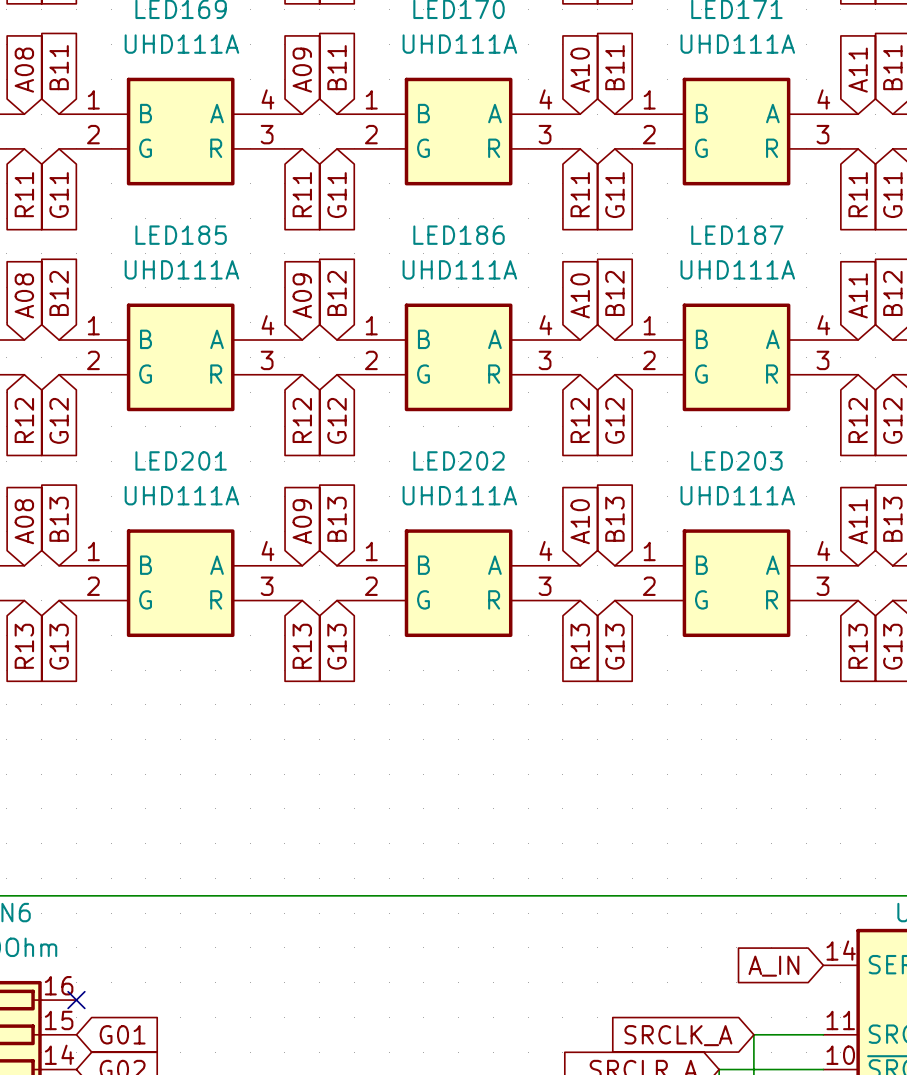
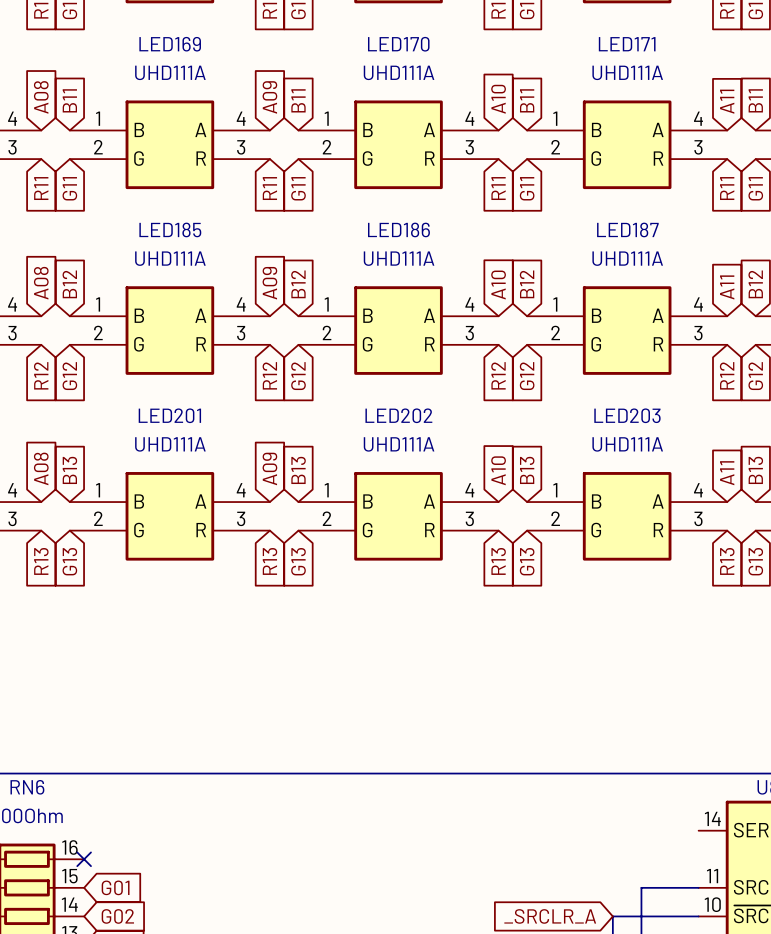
global label: A_IN (773, 966) -> none
global label: SRCLK_A (678, 1035) -> none

